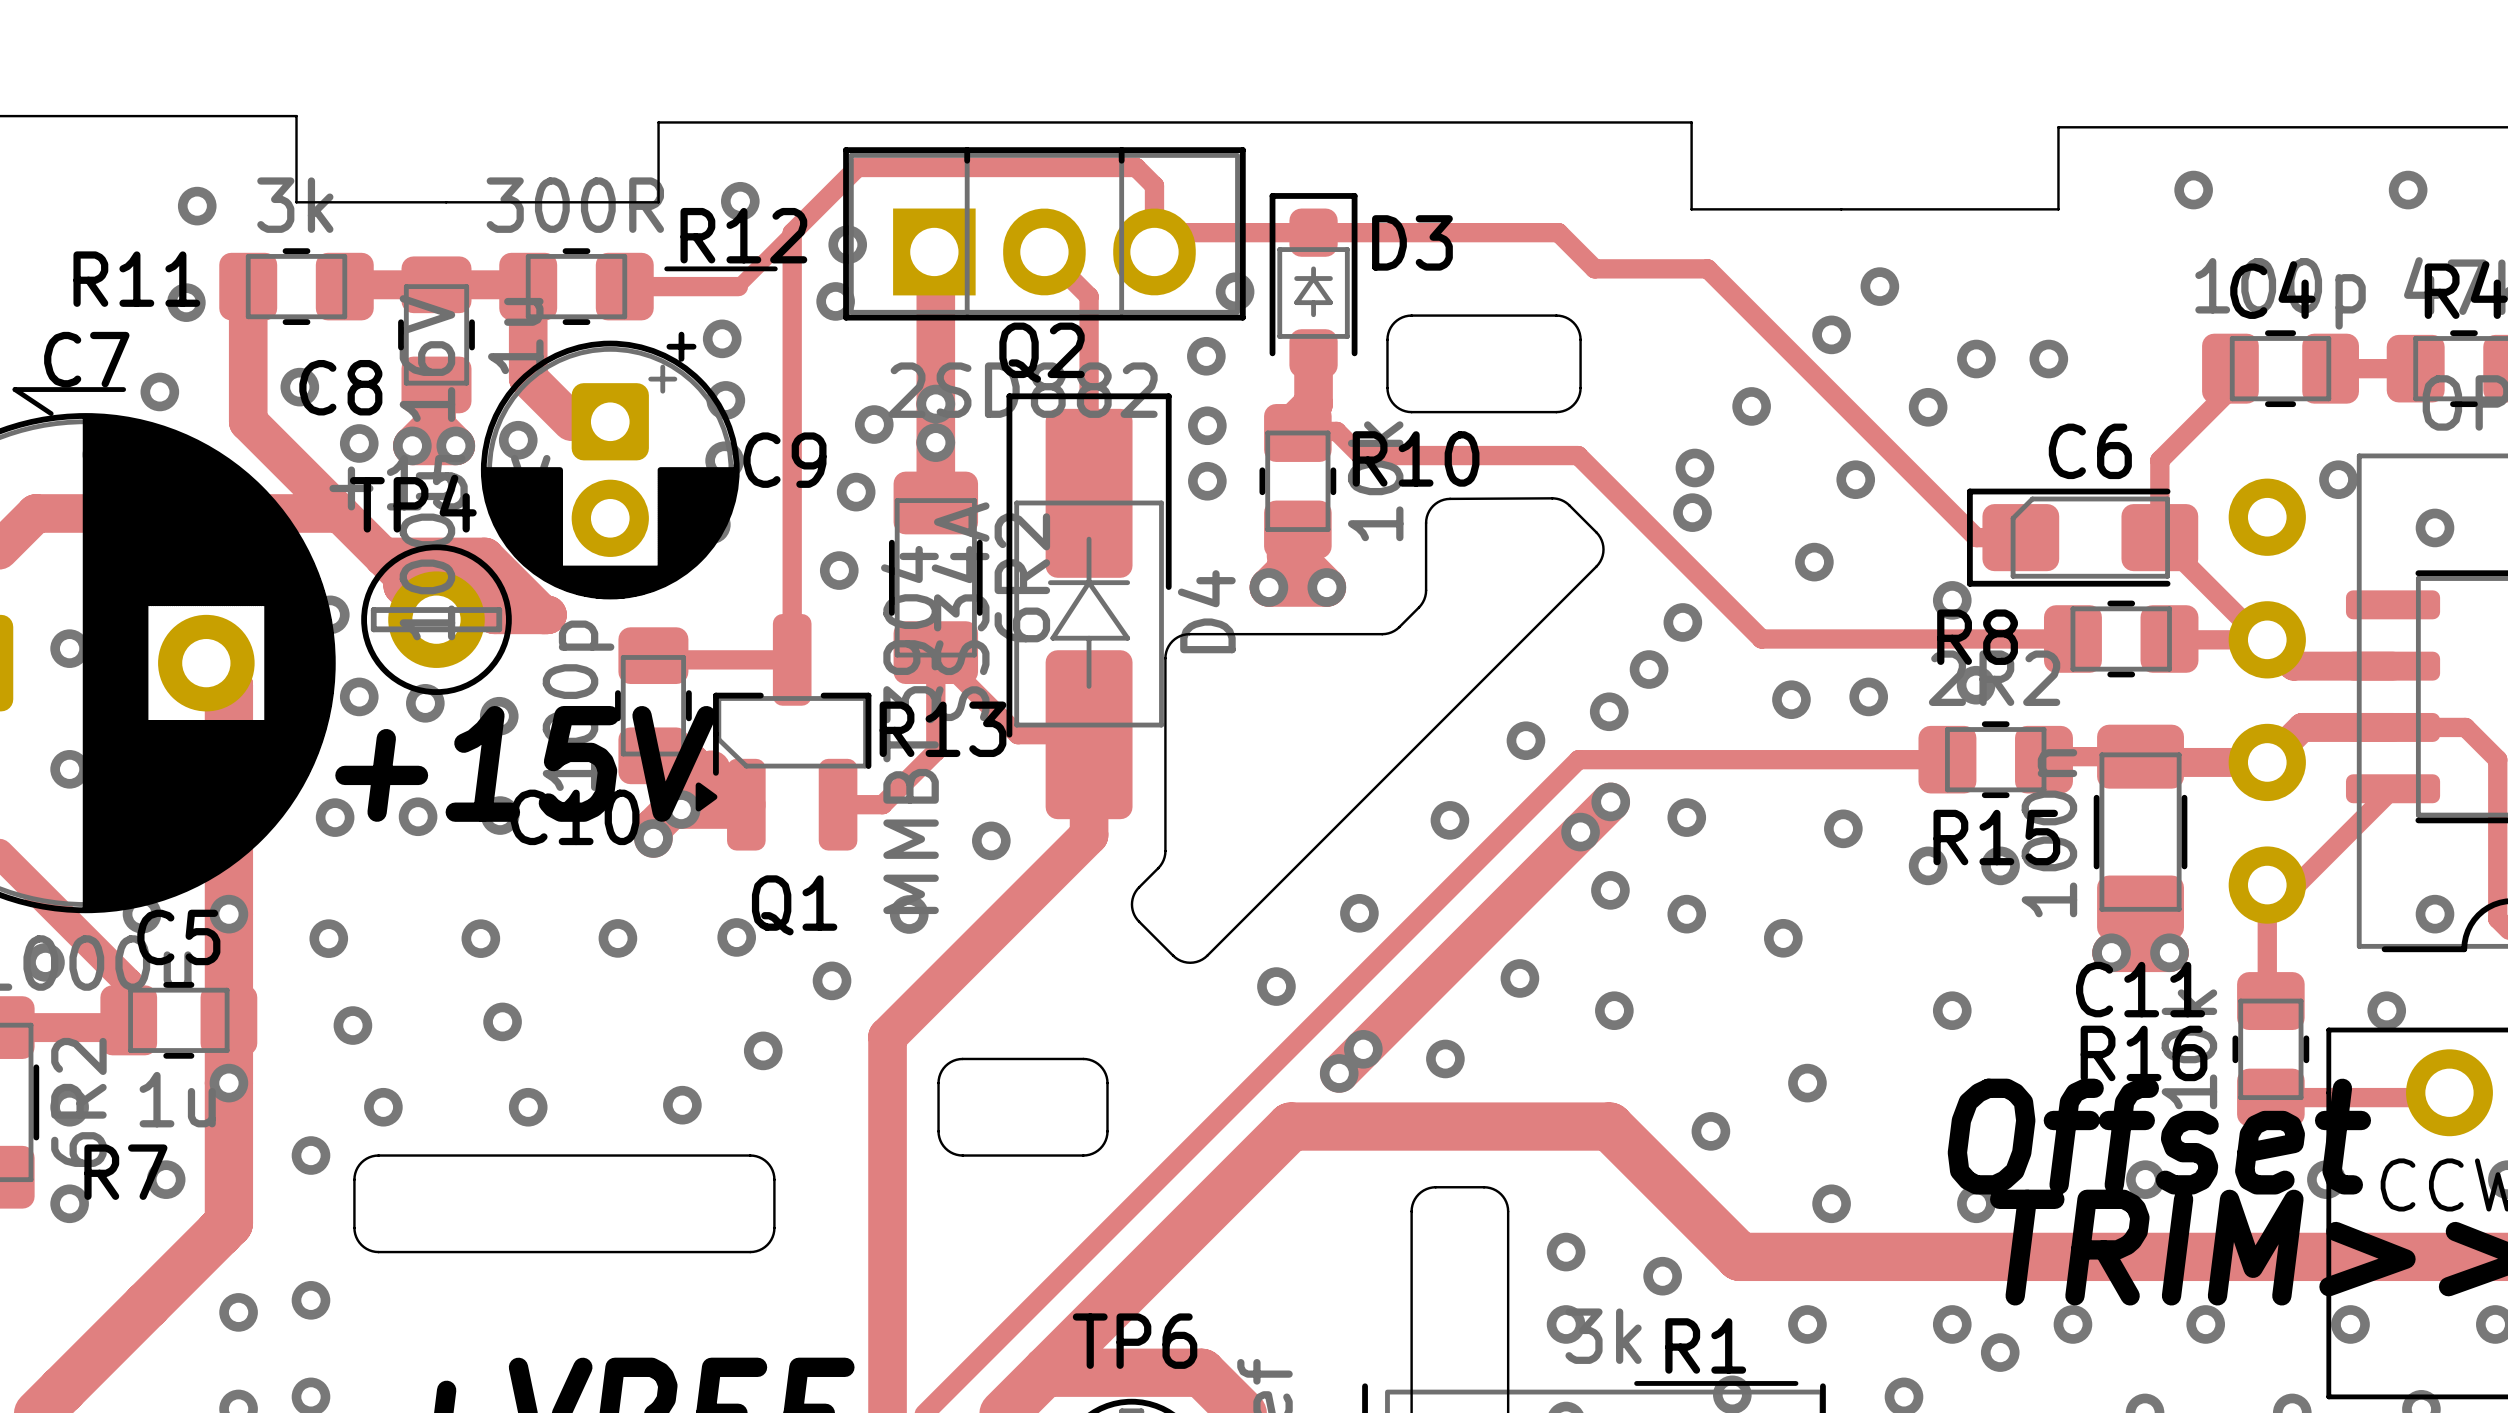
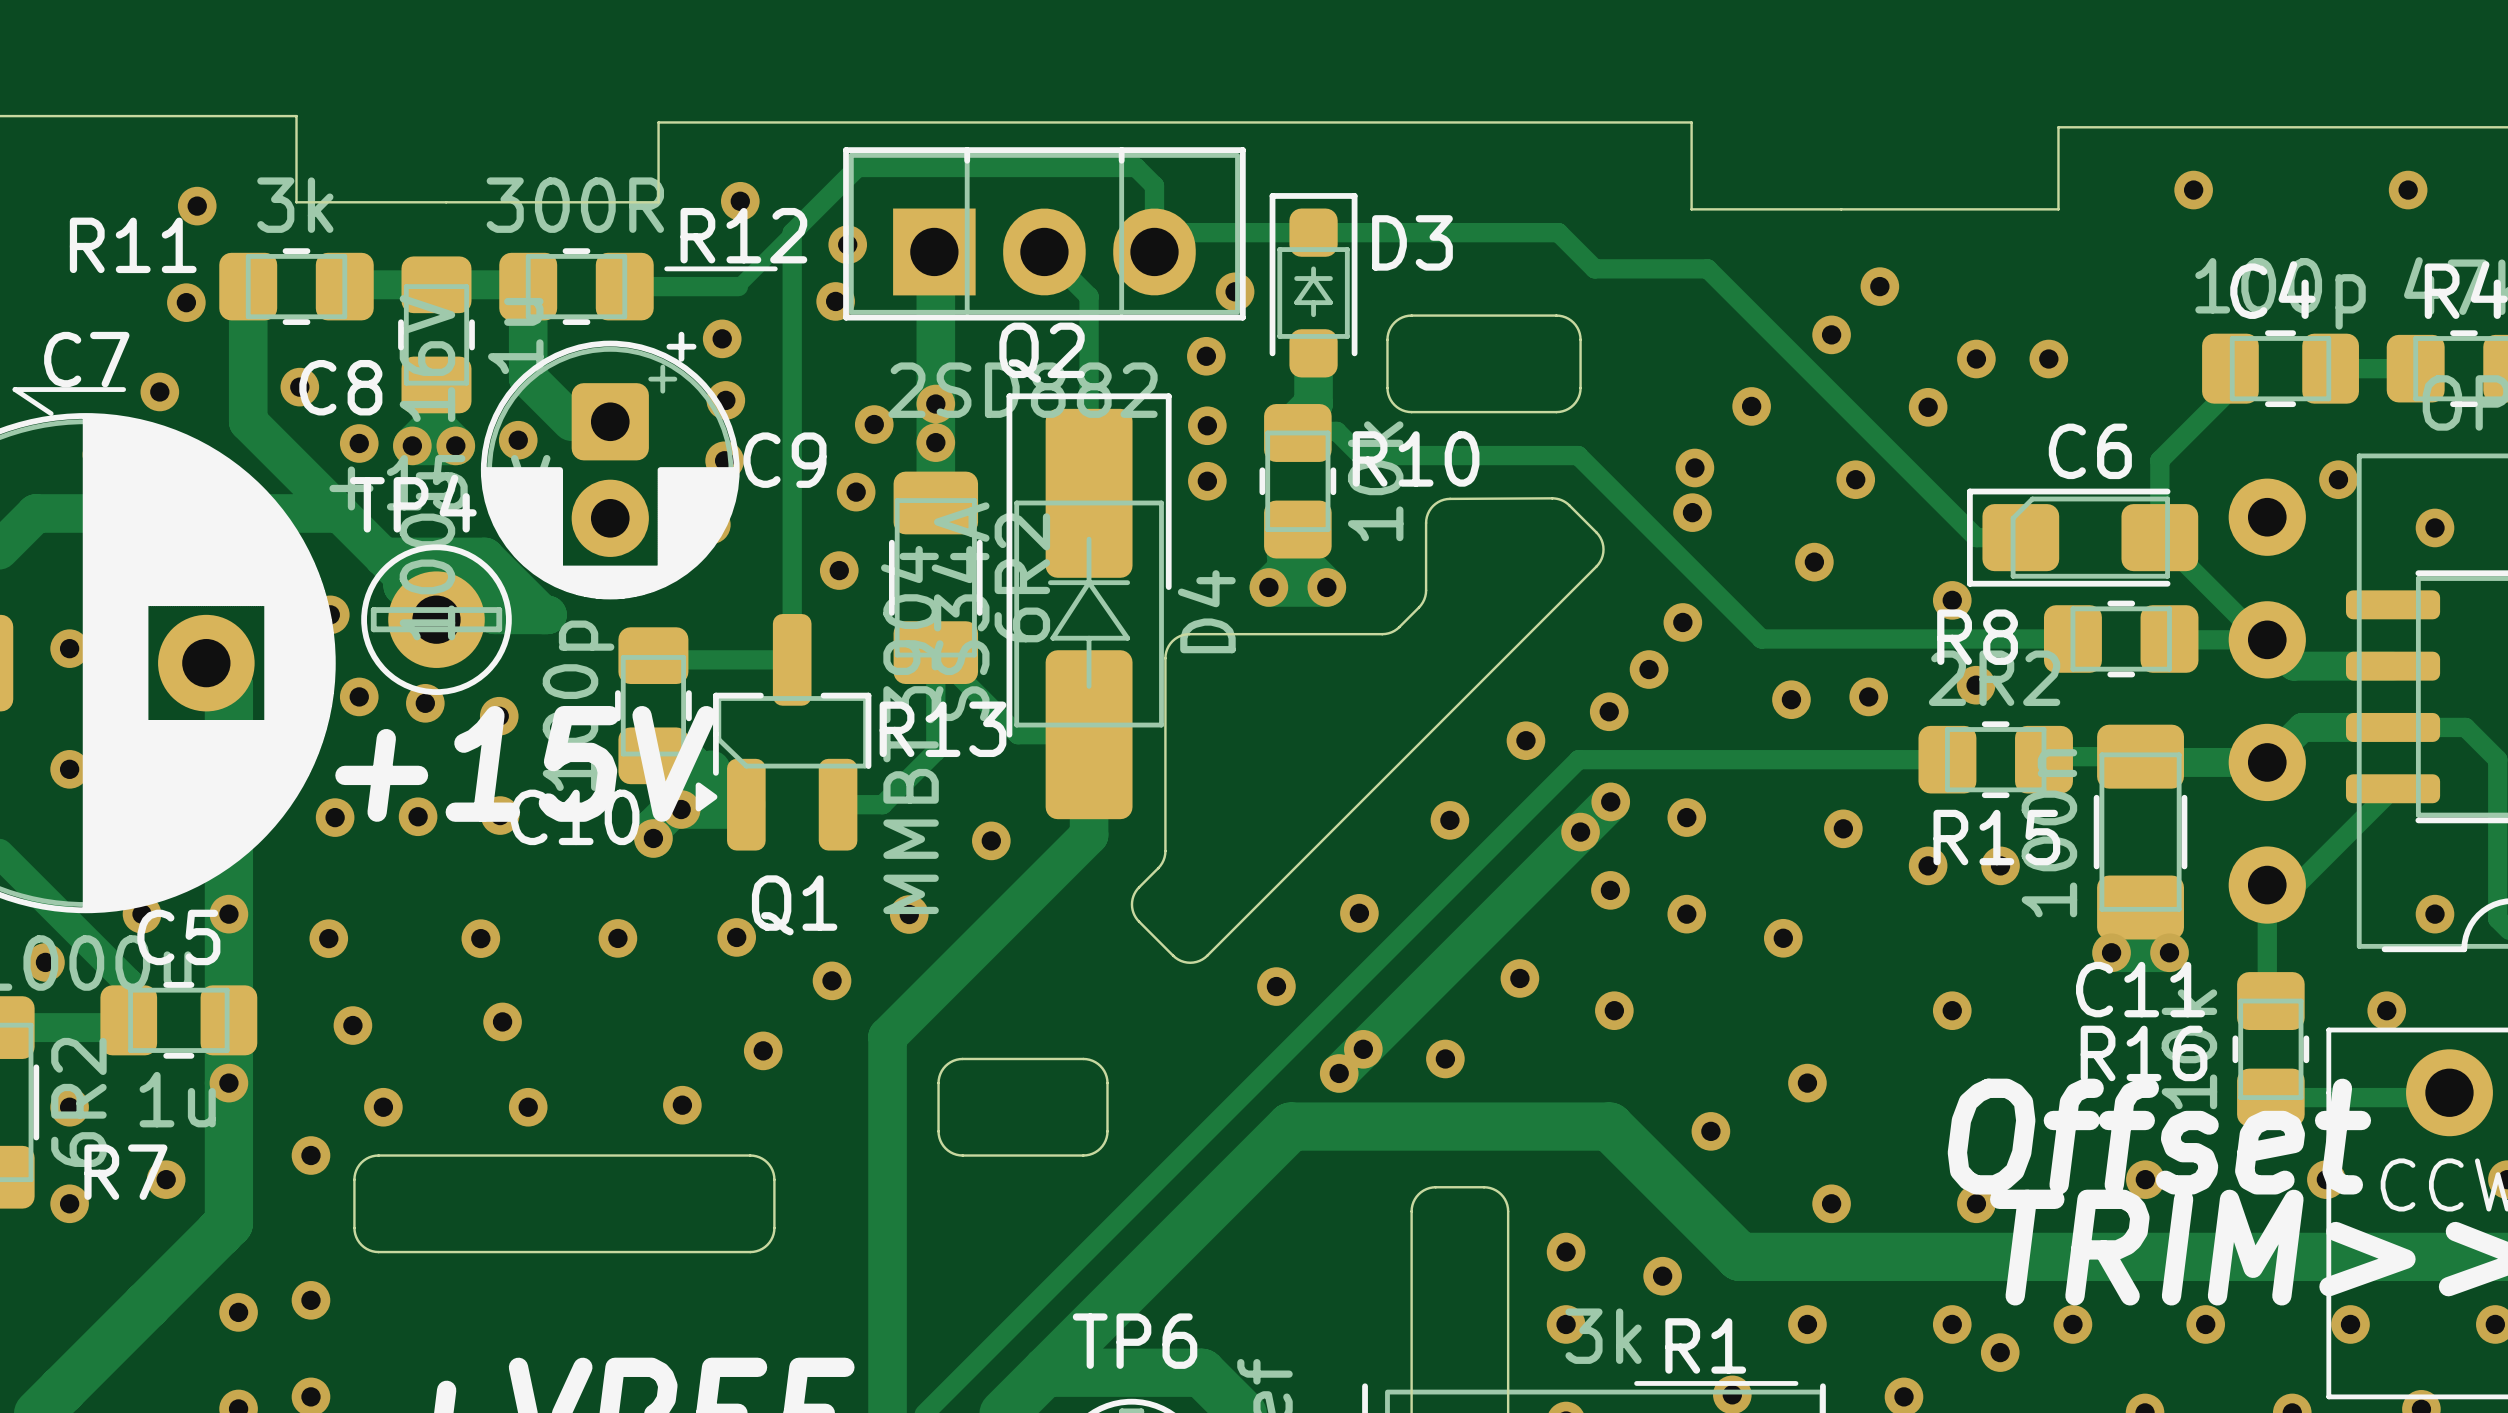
R11 name position: R11 (136, 279) -> R11 (133, 245)

